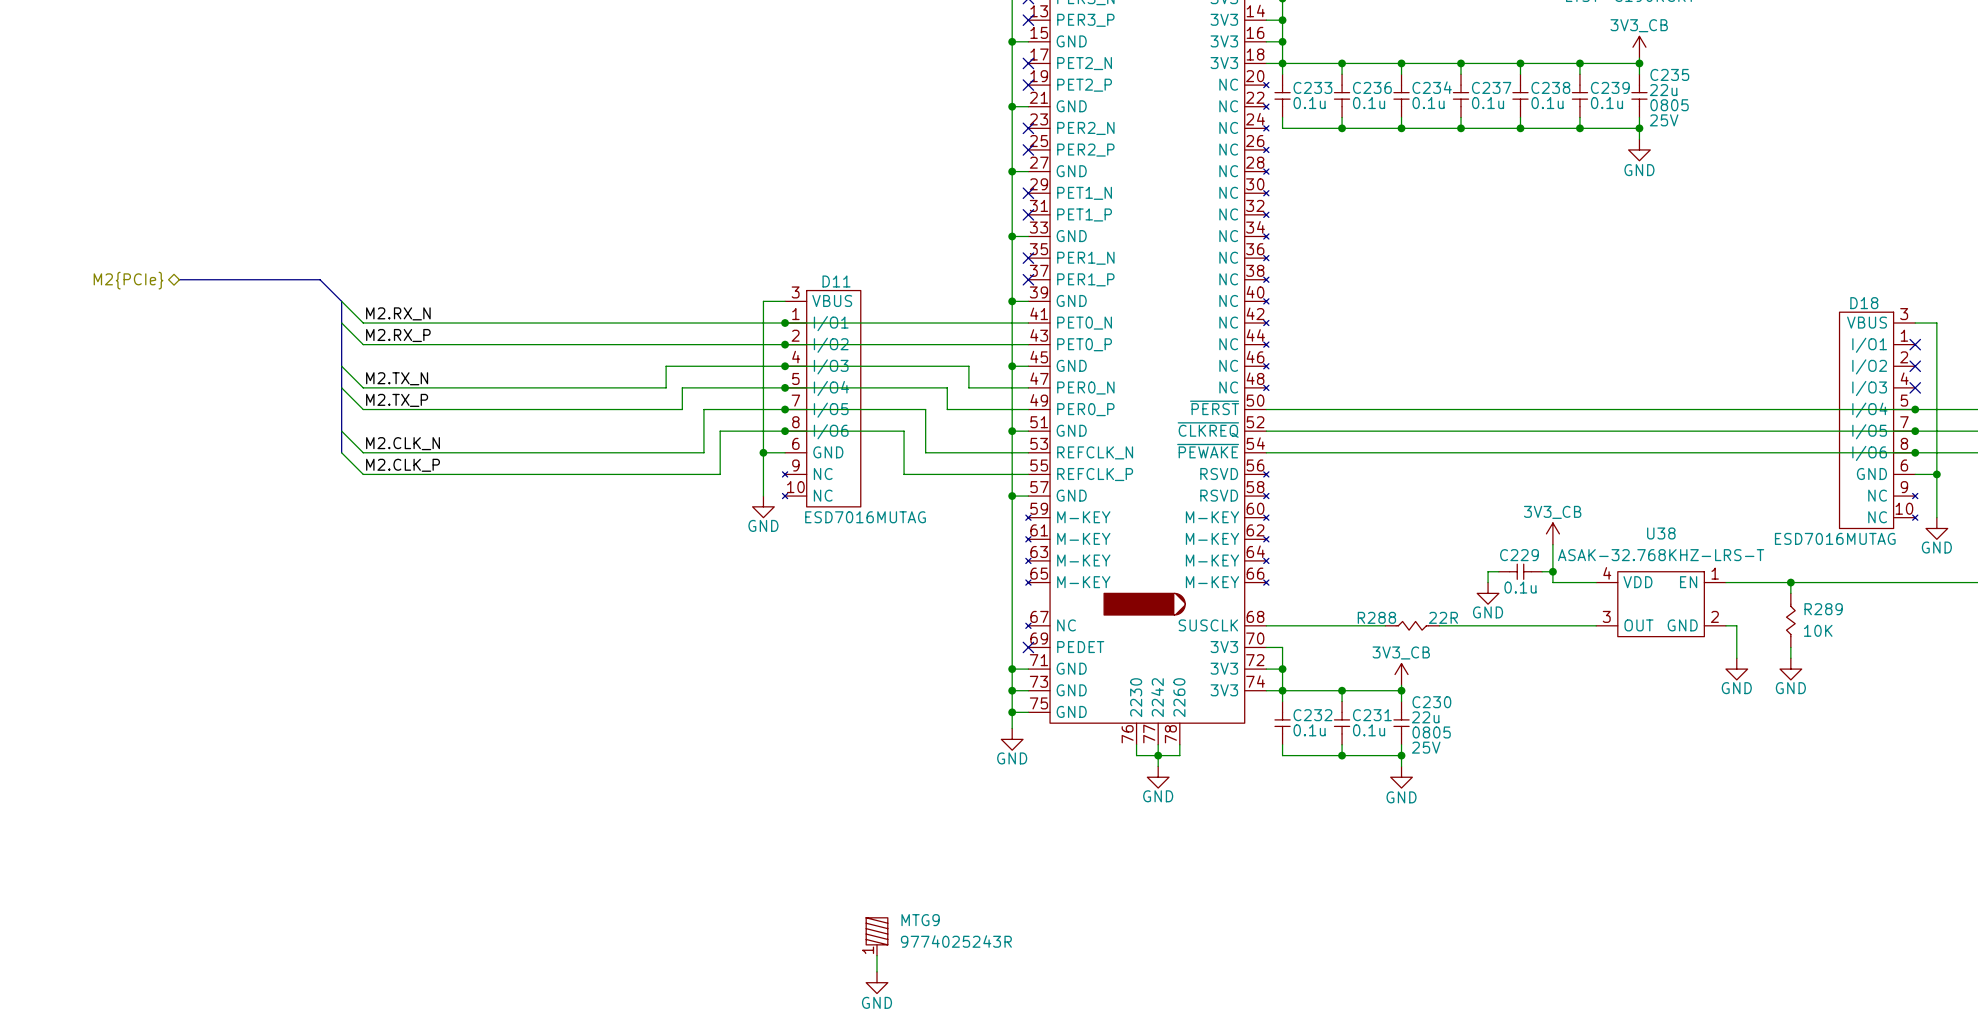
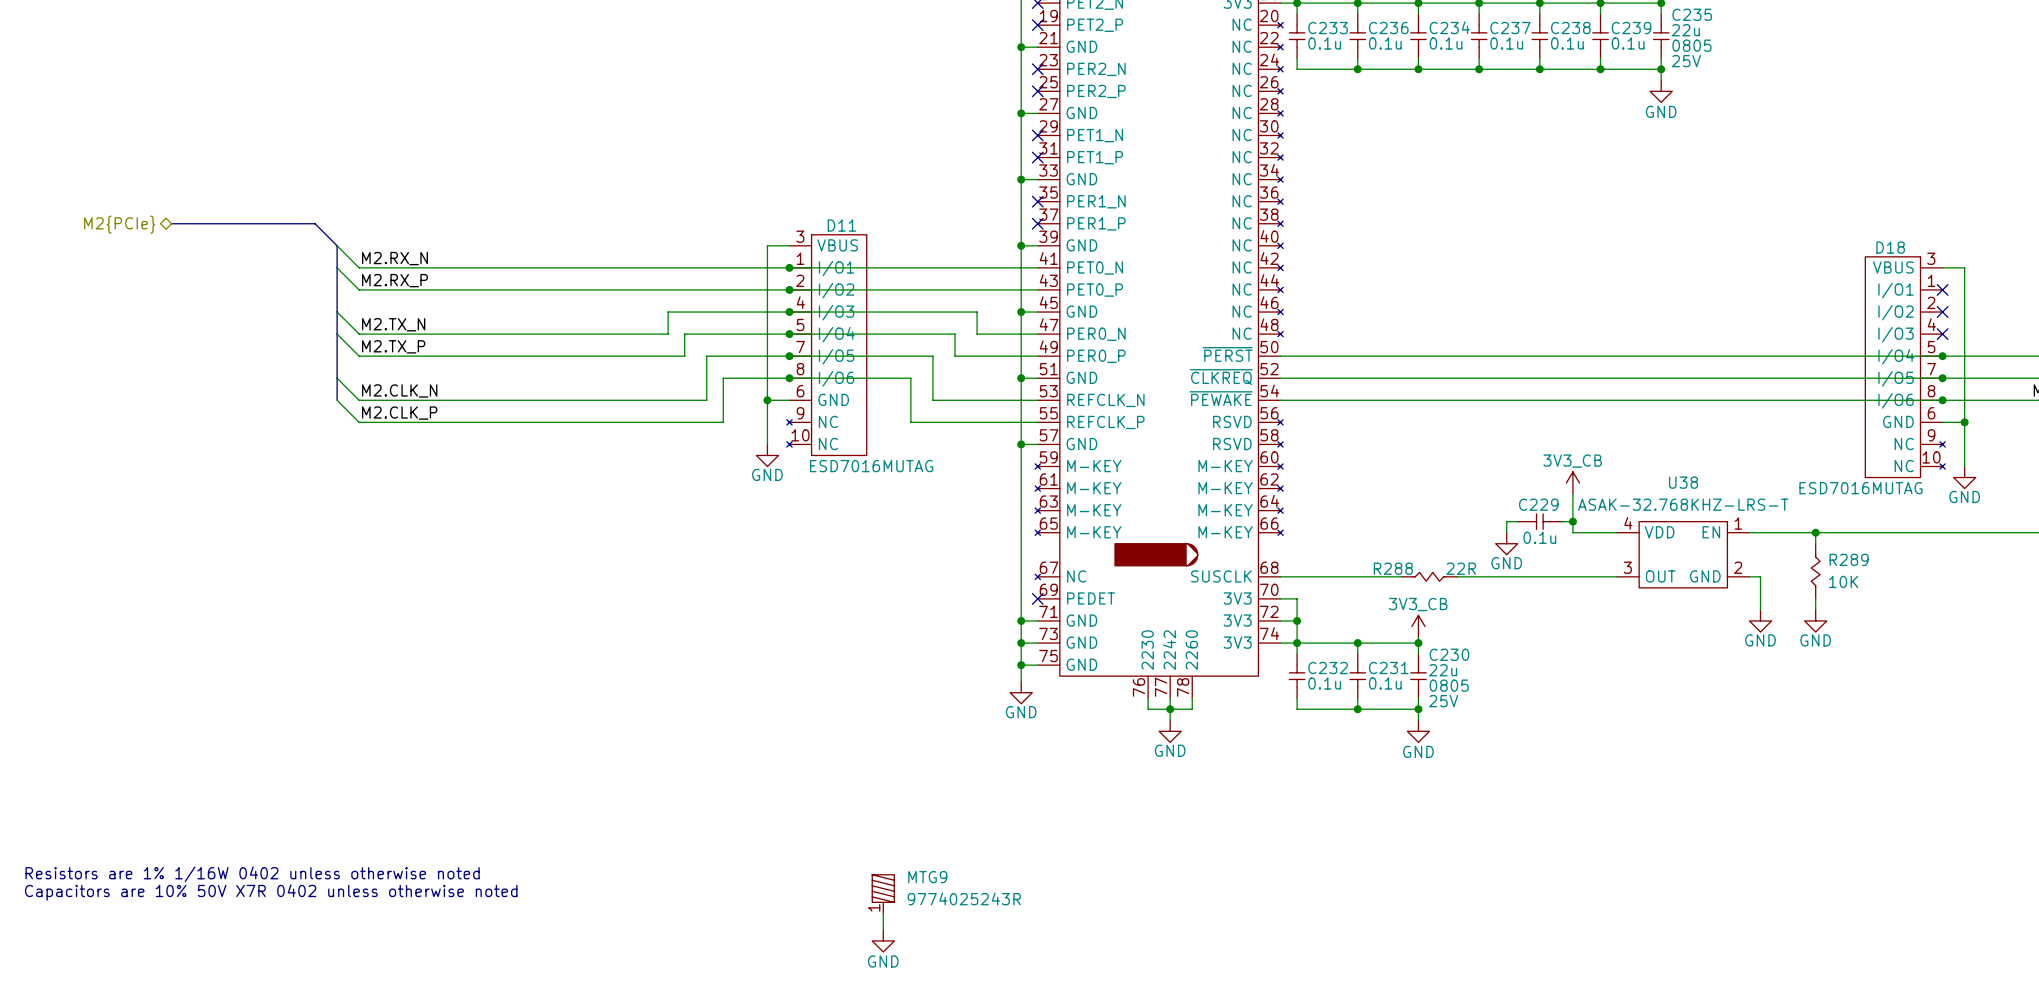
text: none -> Resistors are 1% 1/16W 0402 unless otherwise noted (252, 874)
text: none -> Capacitors are 10% 50V X7R 0402 unless otherwise noted (271, 892)

